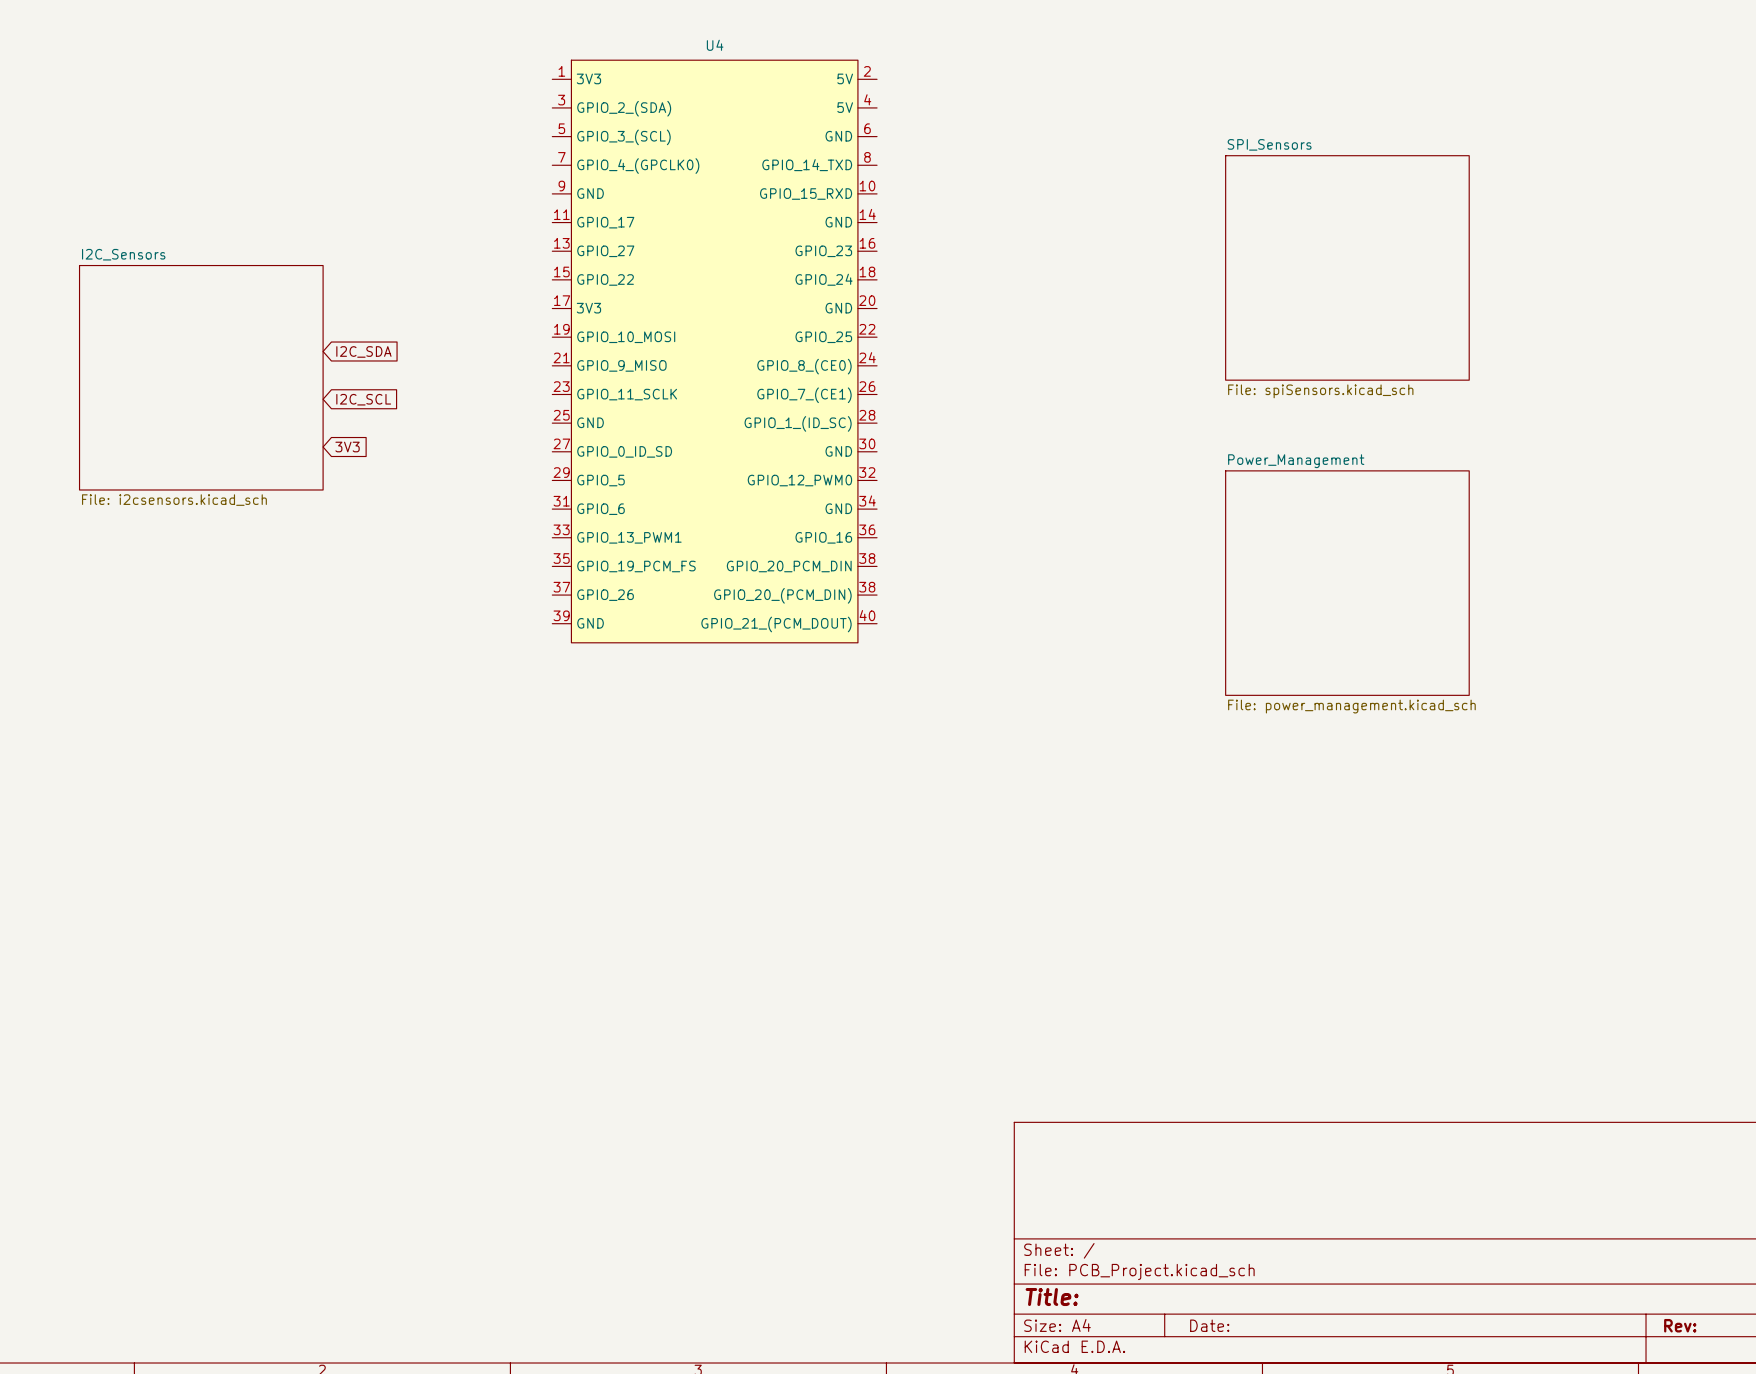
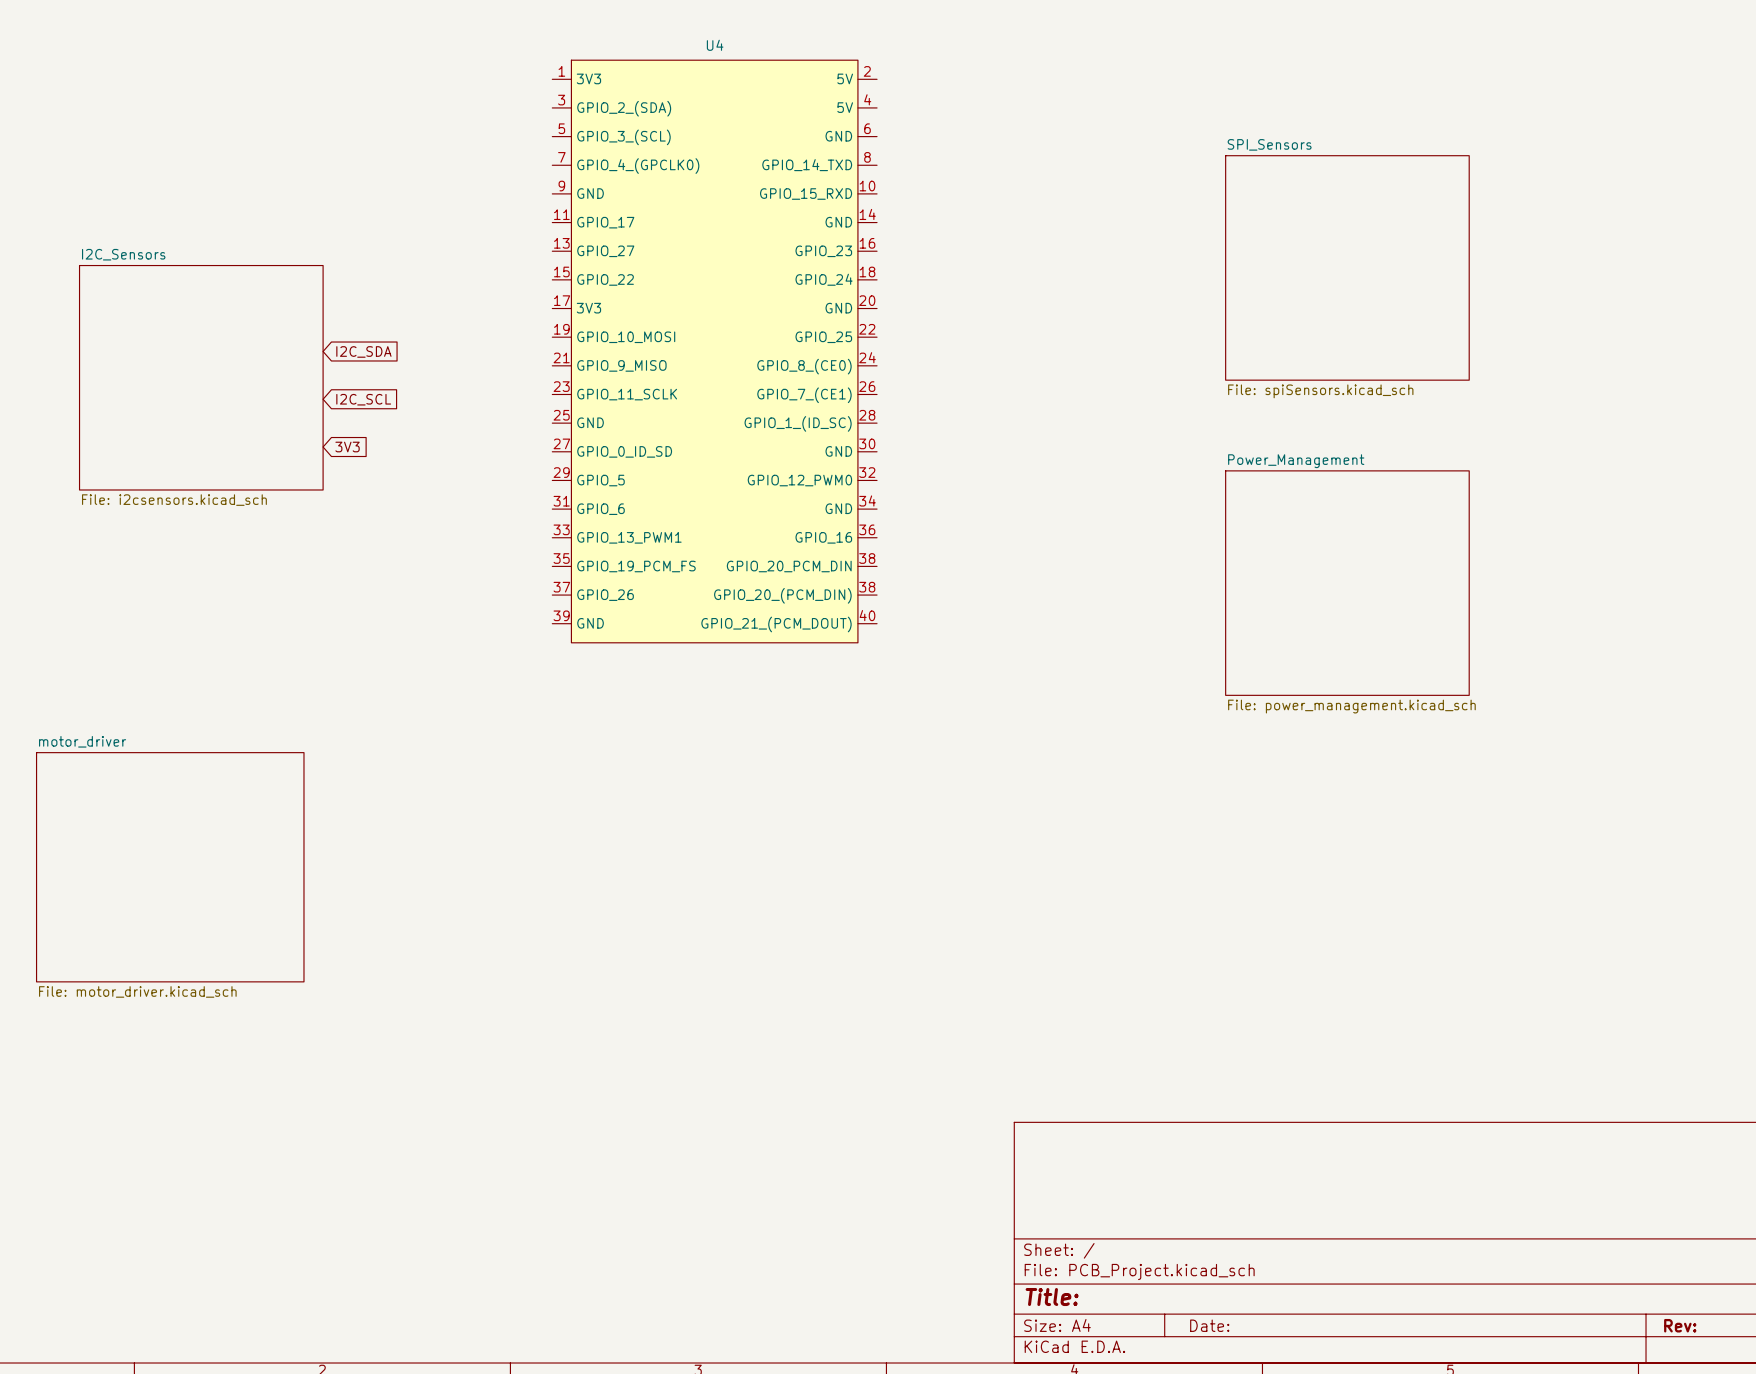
sheet motor_driver: none -> File: motor_driver.kicad_sch (170, 867)

